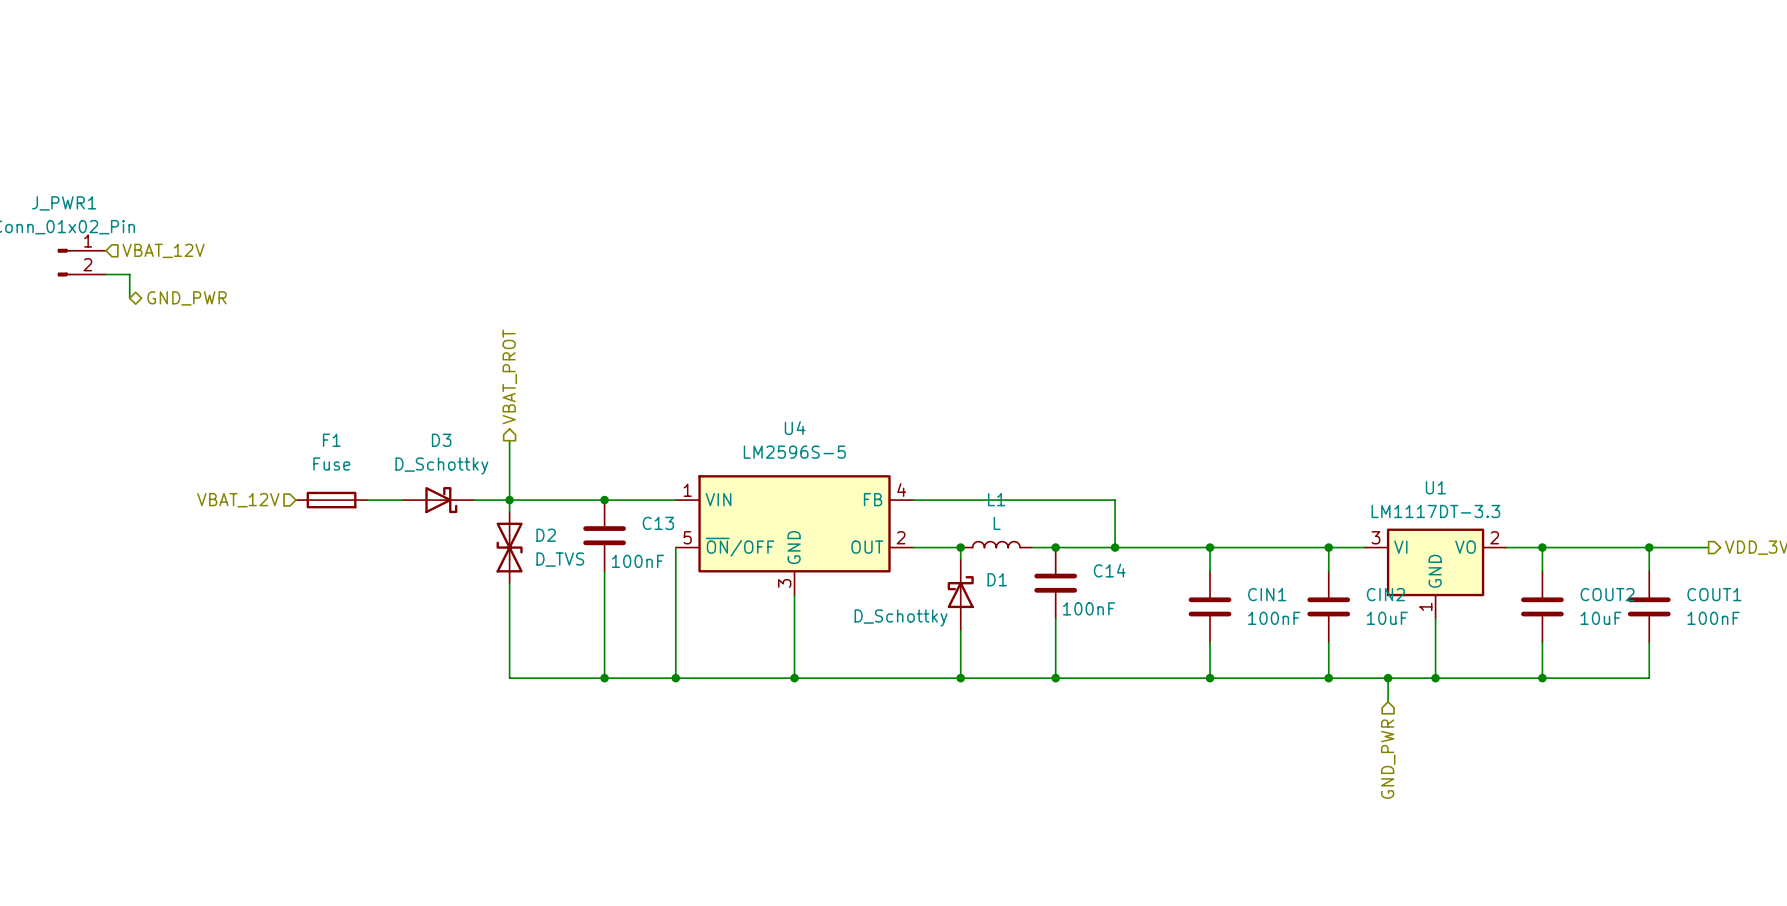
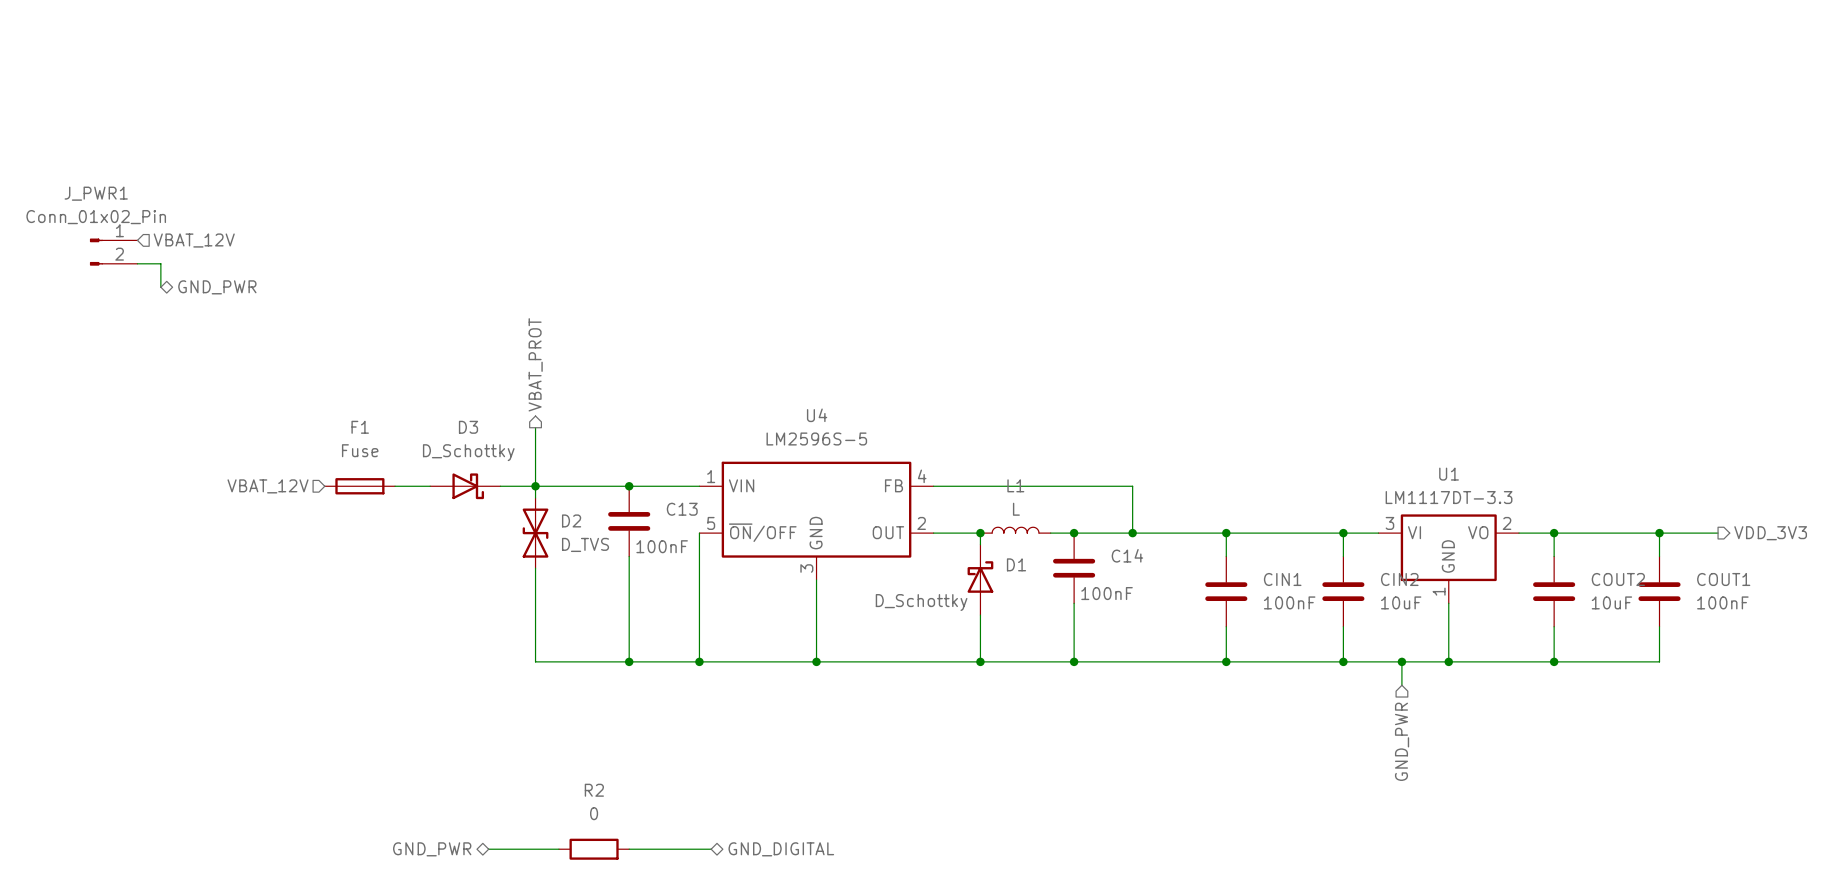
hierarchical label: none -> GND_PWR (432, 849)
wire: none -> (488, 849) (558, 849)
R2: none -> 0 (594, 849)
wire: none -> (629, 849) (711, 849)
hierarchical label: none -> GND_DIGITAL (781, 849)

